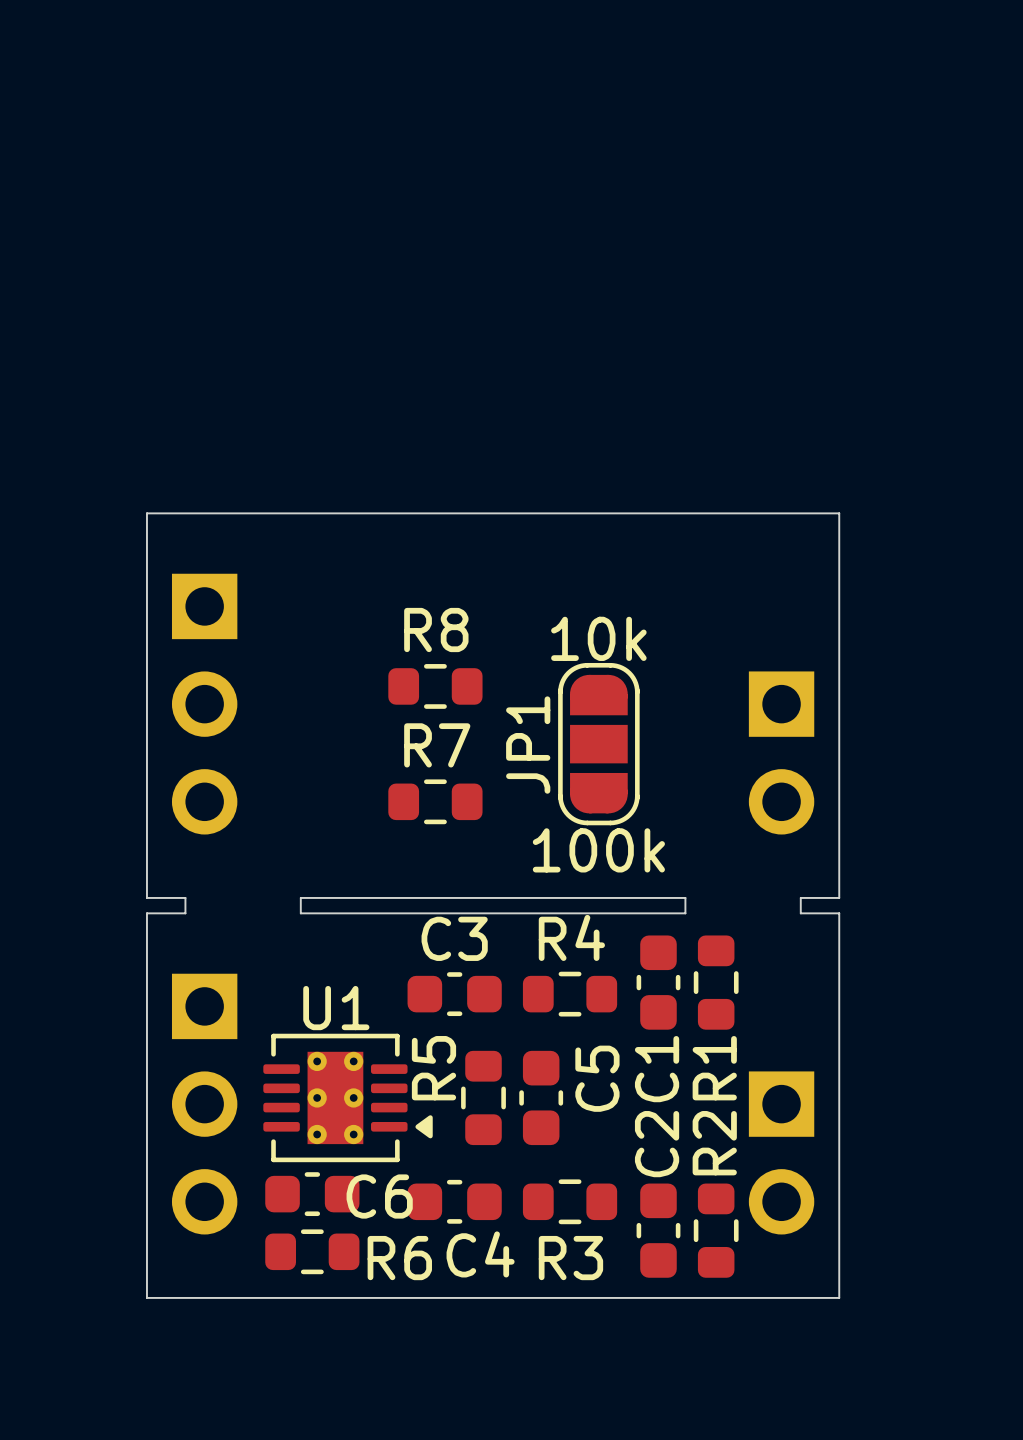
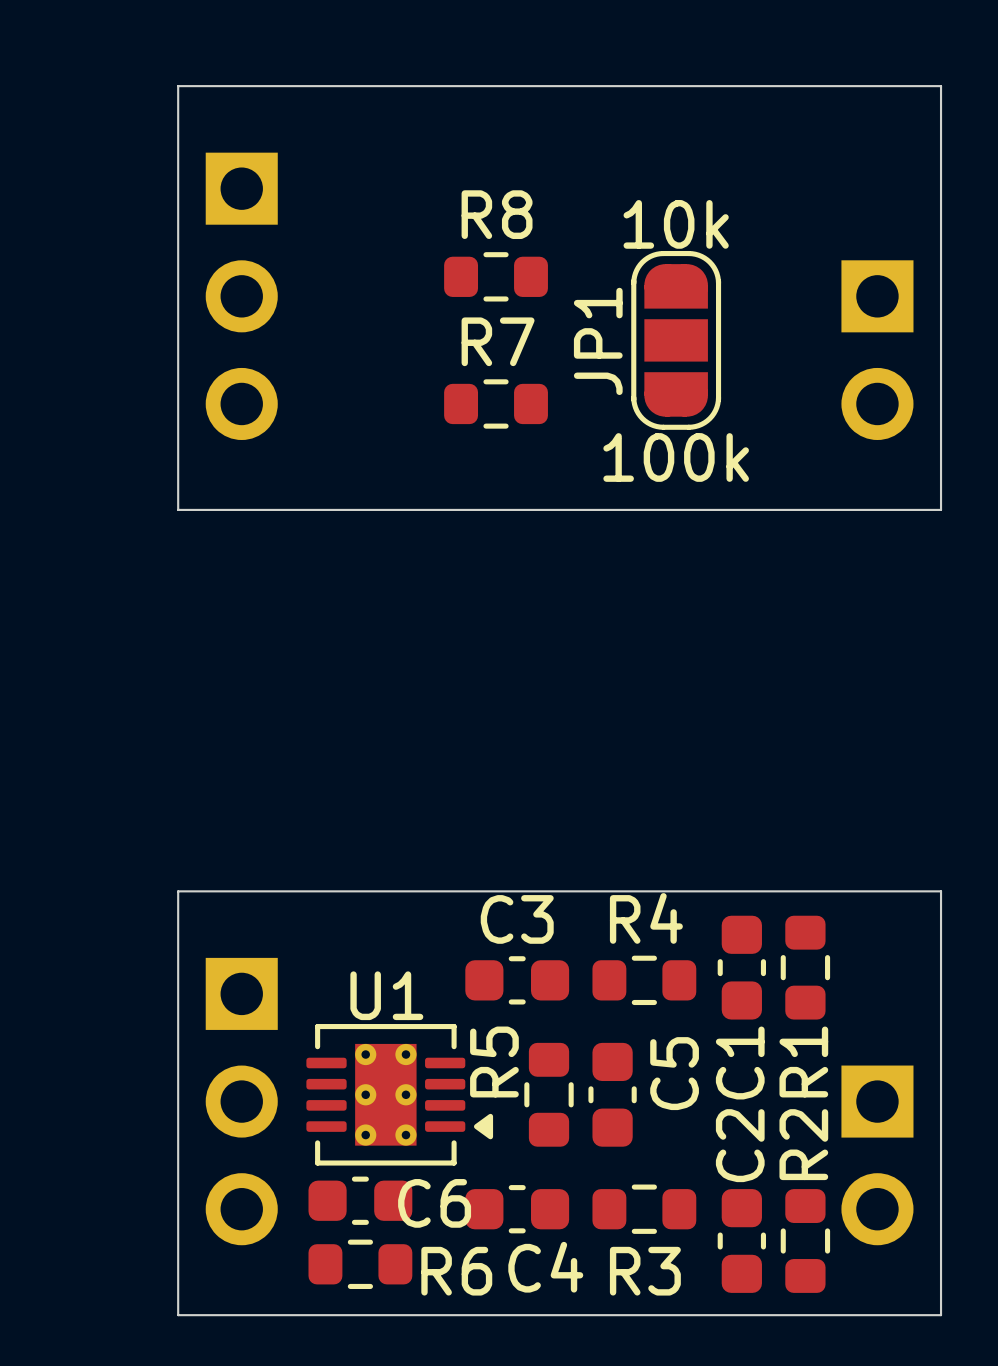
board edge: (146, 513) (839, 513) -> (178, 450) (178, 86) (941, 86) (941, 450)
board edge: (146, 567) (146, 897) (185, 897) (185, 913) -> (347, 891) (220, 891)
board edge: none -> (178, 509) (941, 509)
board edge: (839, 567) (839, 897) (800, 897) (800, 913) -> (771, 891) (898, 891)
R8 position: (435, 686) -> (496, 276)
part position: (204, 704) -> (241, 296)
JP1 position: (598, 744) -> (676, 340)
part position: (781, 752) -> (877, 350)
R7 position: (435, 801) -> (496, 403)
board edge: (300, 913) (300, 897) (685, 897) (685, 913) -> none

